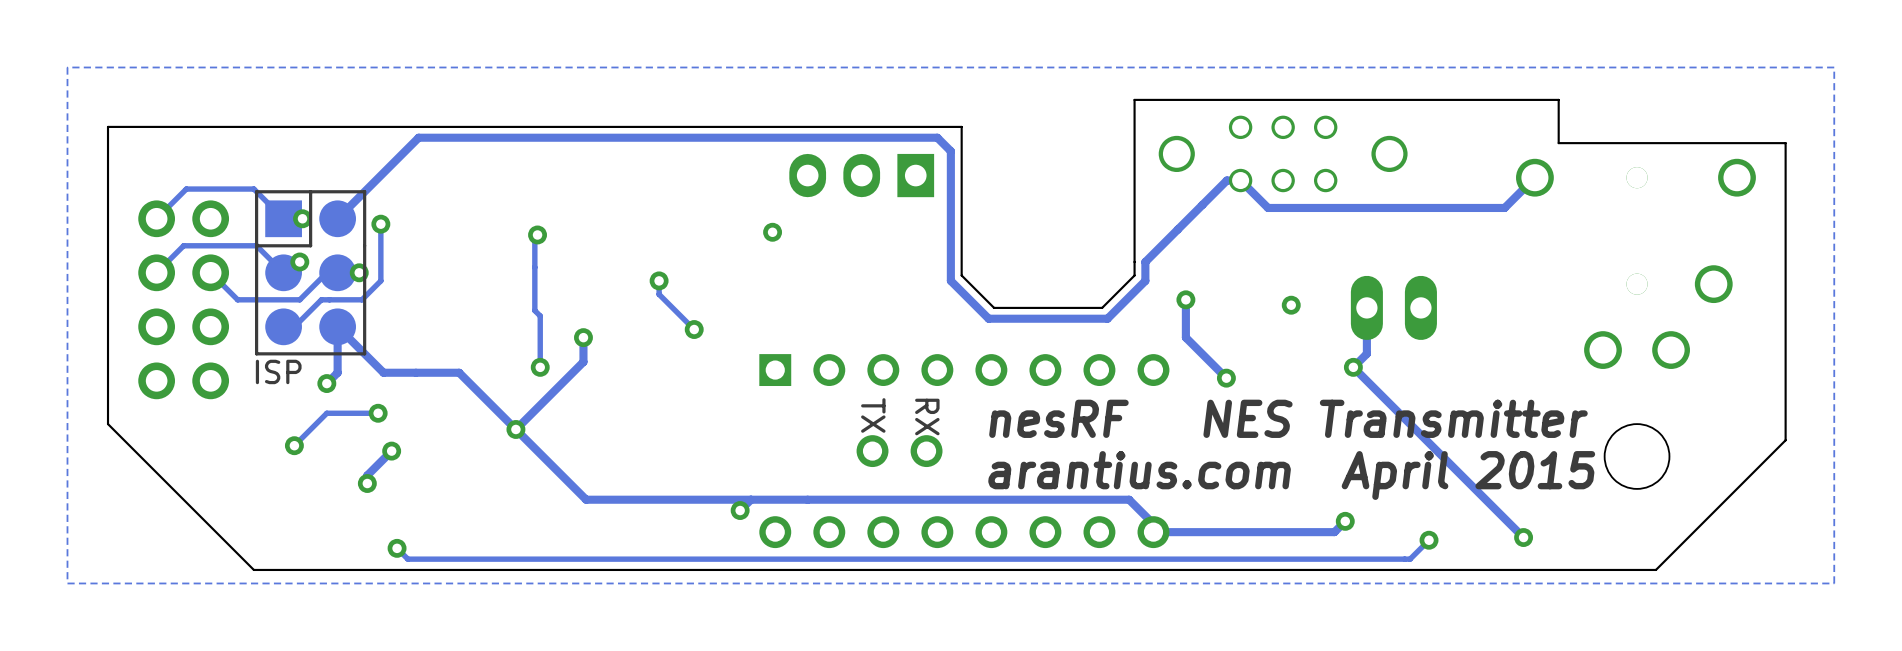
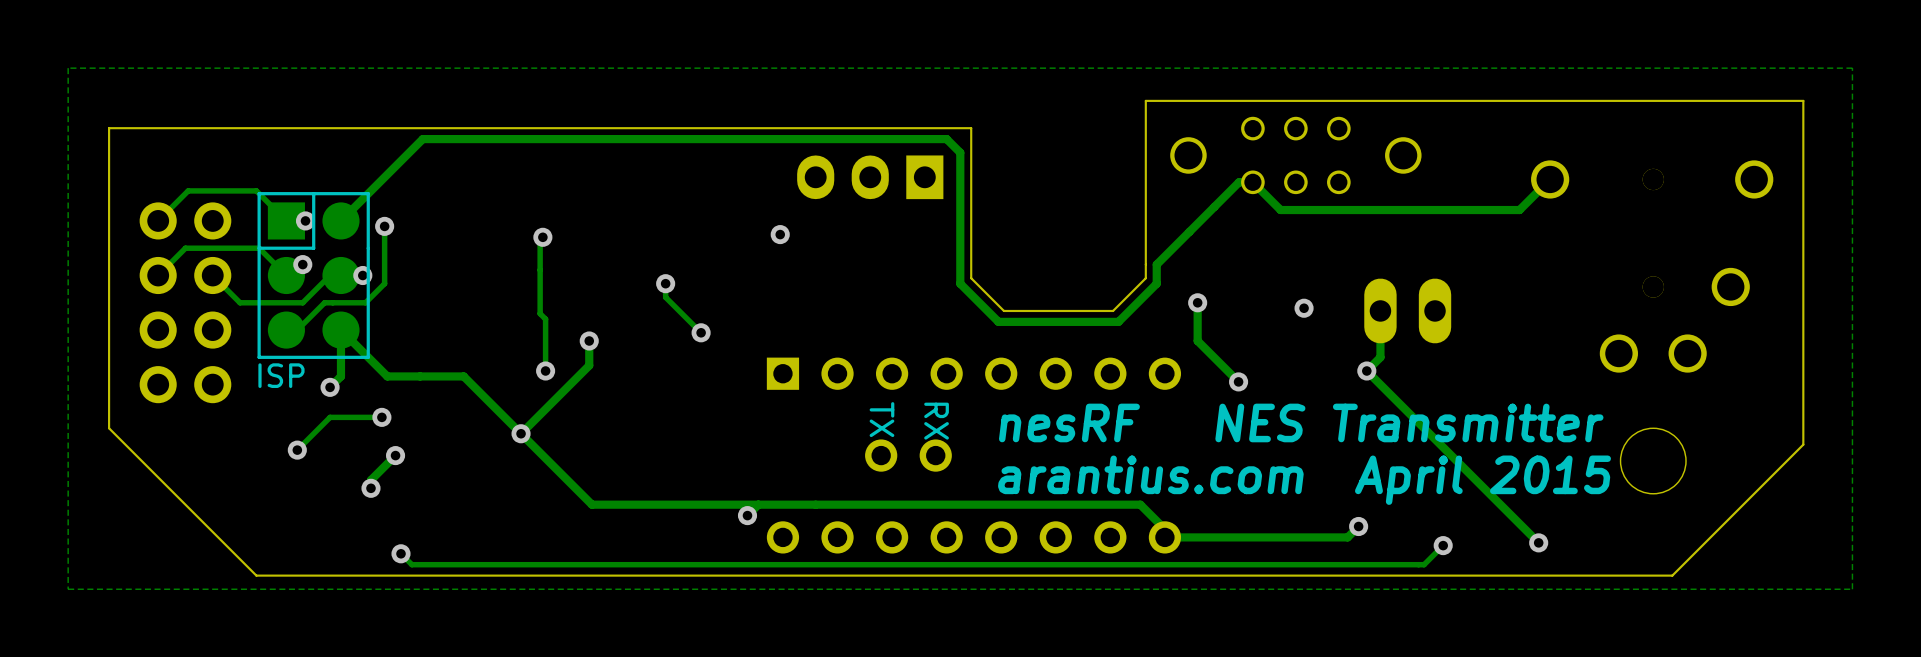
board edge: (1558, 99) (1558, 143) (1785, 143) -> (1574, 100) (1803, 100) (1803, 144)

